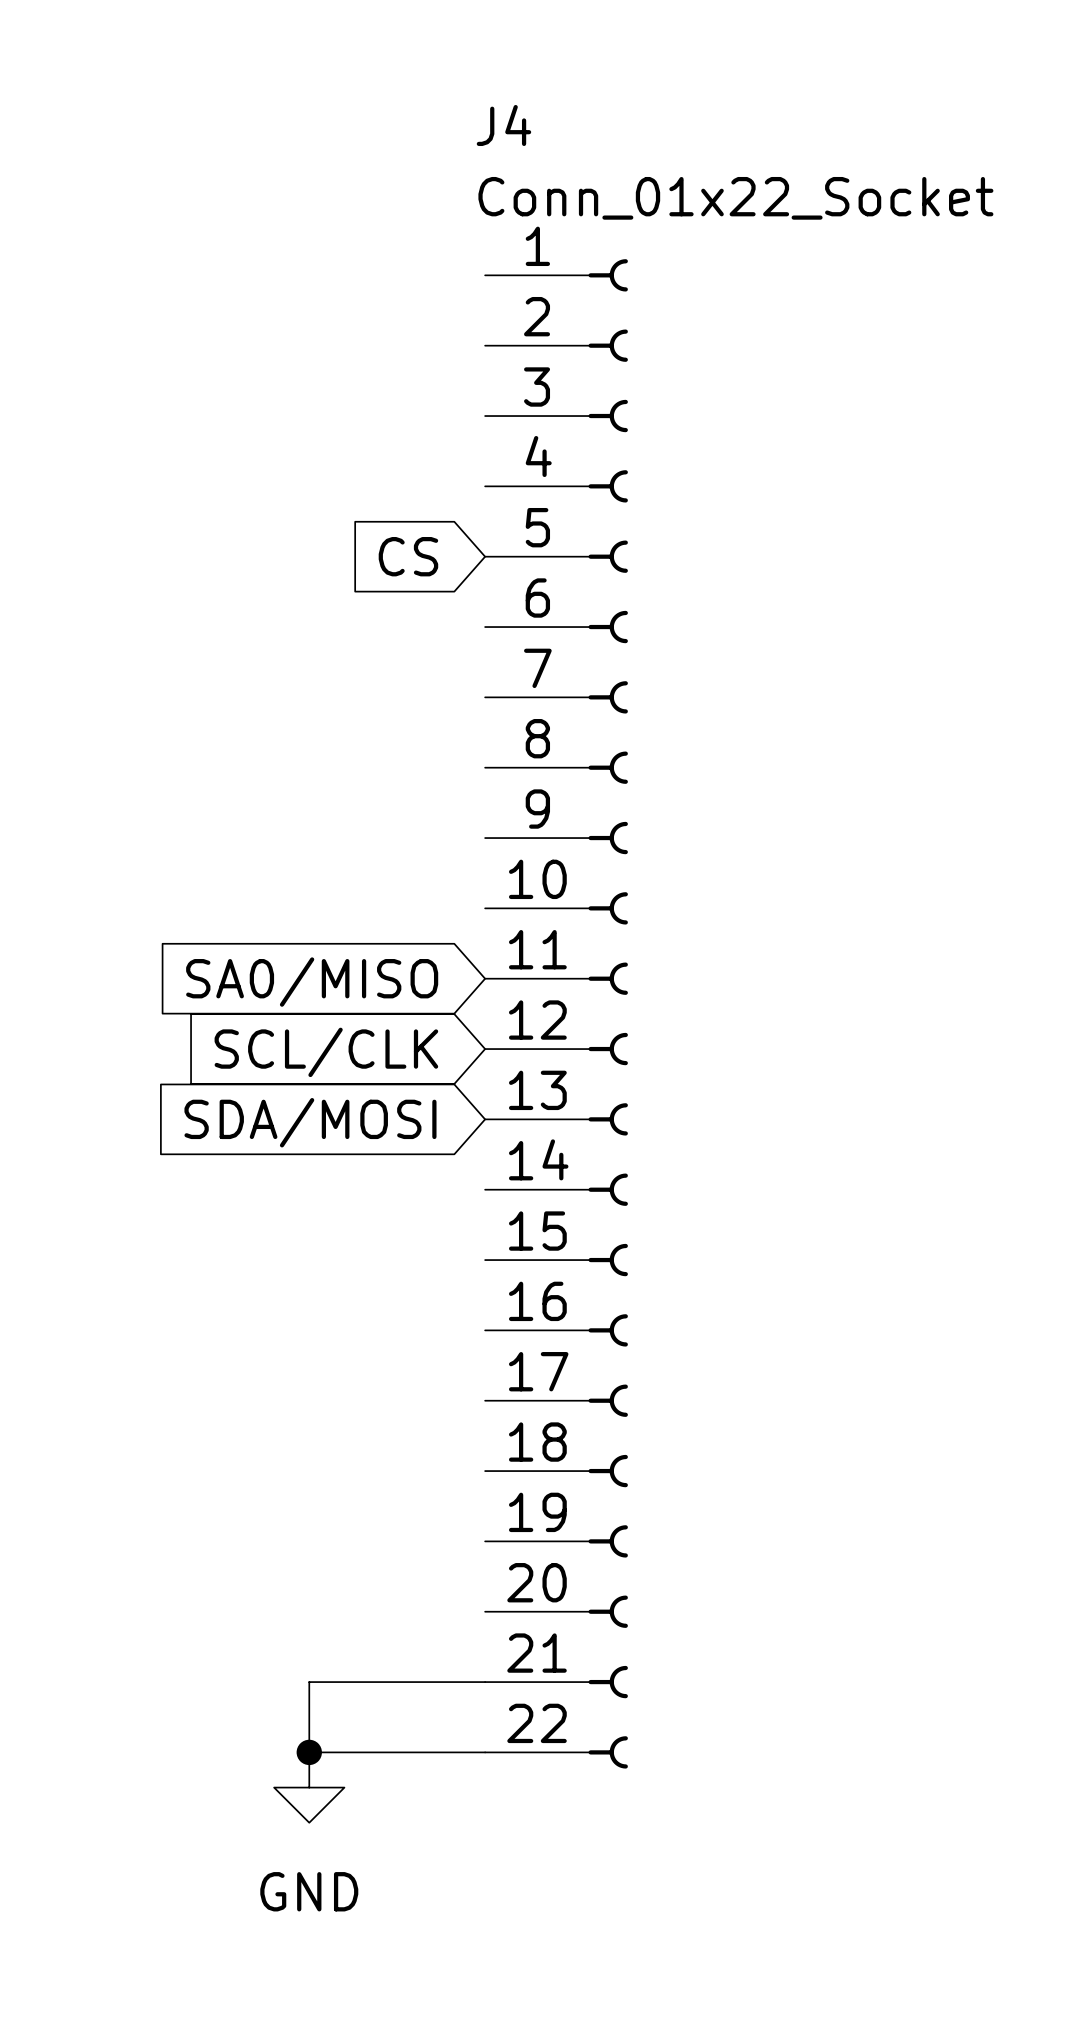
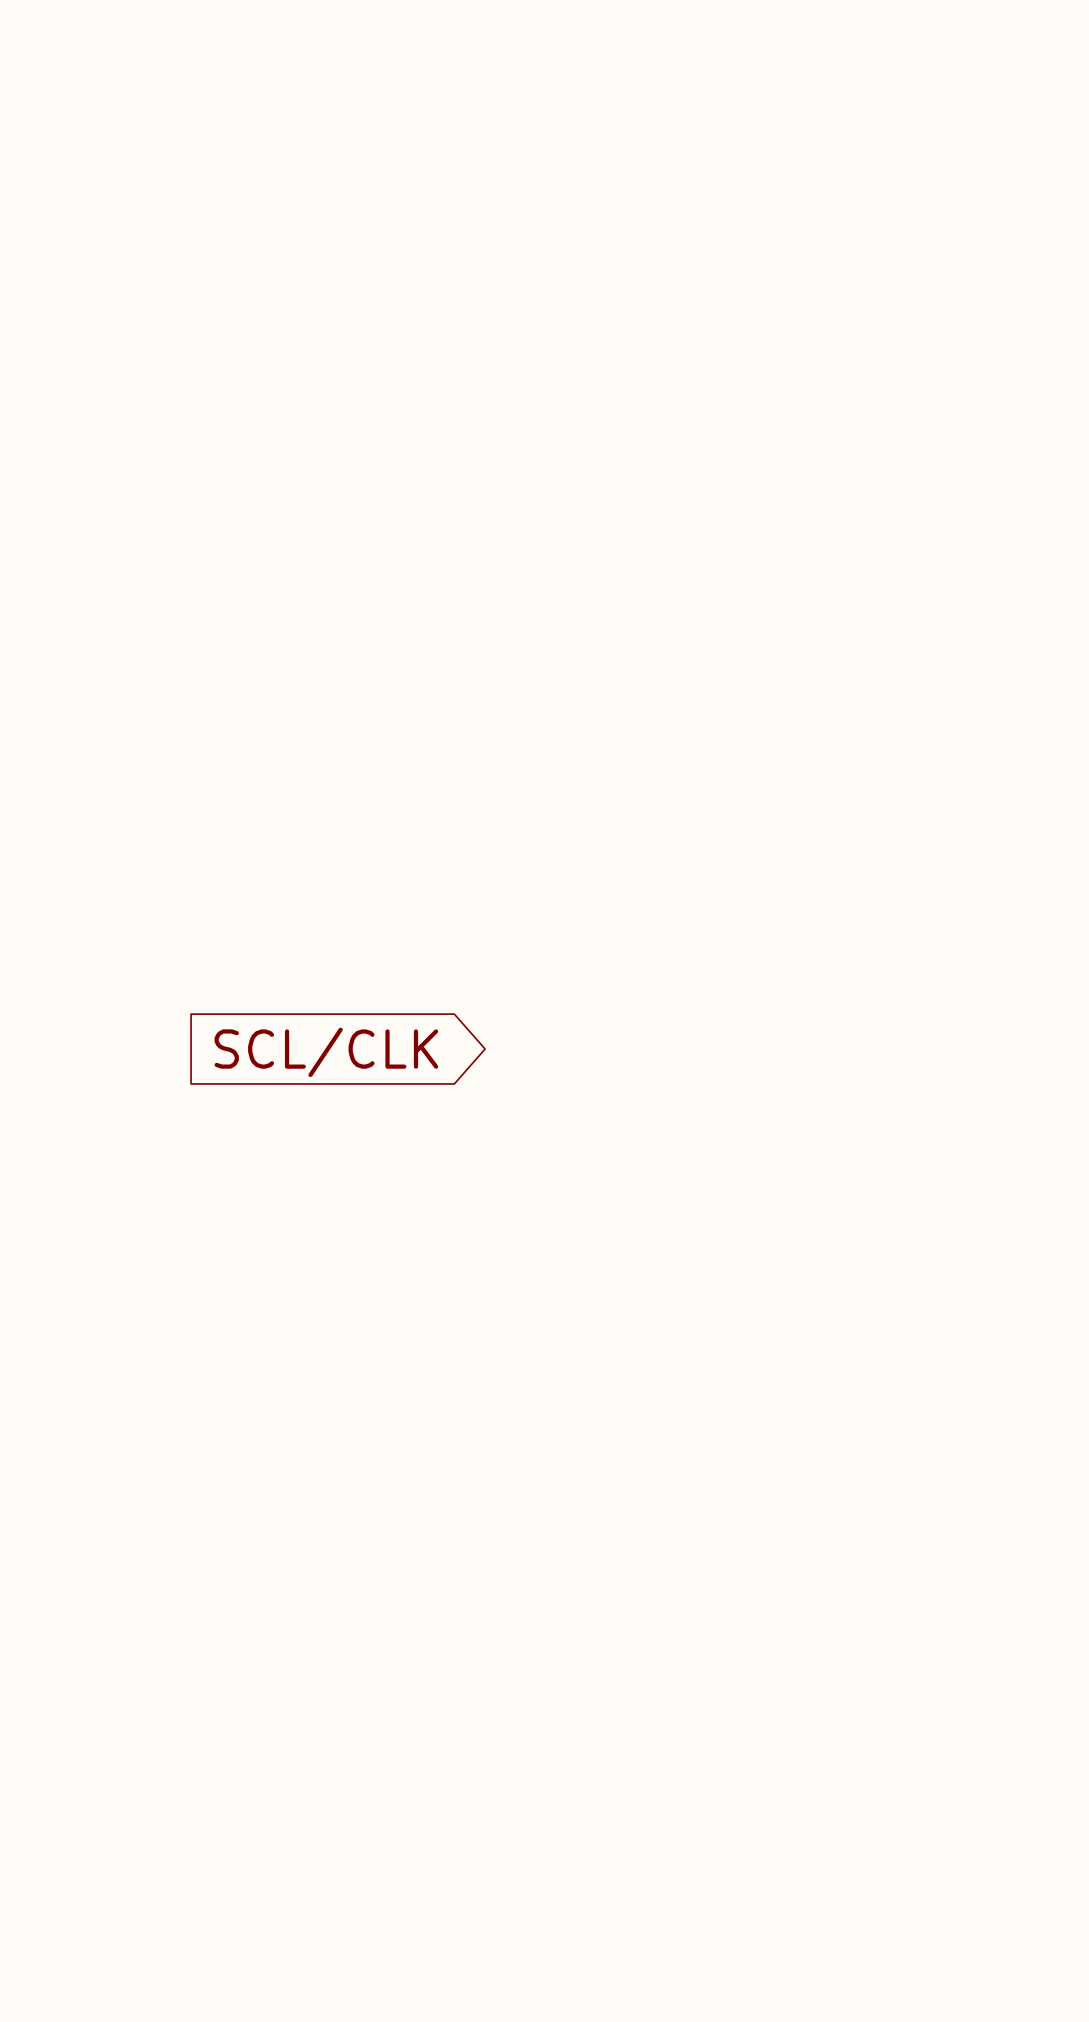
global label: CS (408, 556) -> none
global label: SA0/MISO (312, 982) -> none
J4: Conn_01x22_Socket (556, 1013) -> none
global label: SDA/MOSI (310, 1122) -> none
wire: (485, 1682) (309, 1682) (309, 1752) (485, 1752) -> none
junction: (309, 1752) -> none
power symbol: GND (309, 1787) -> none

